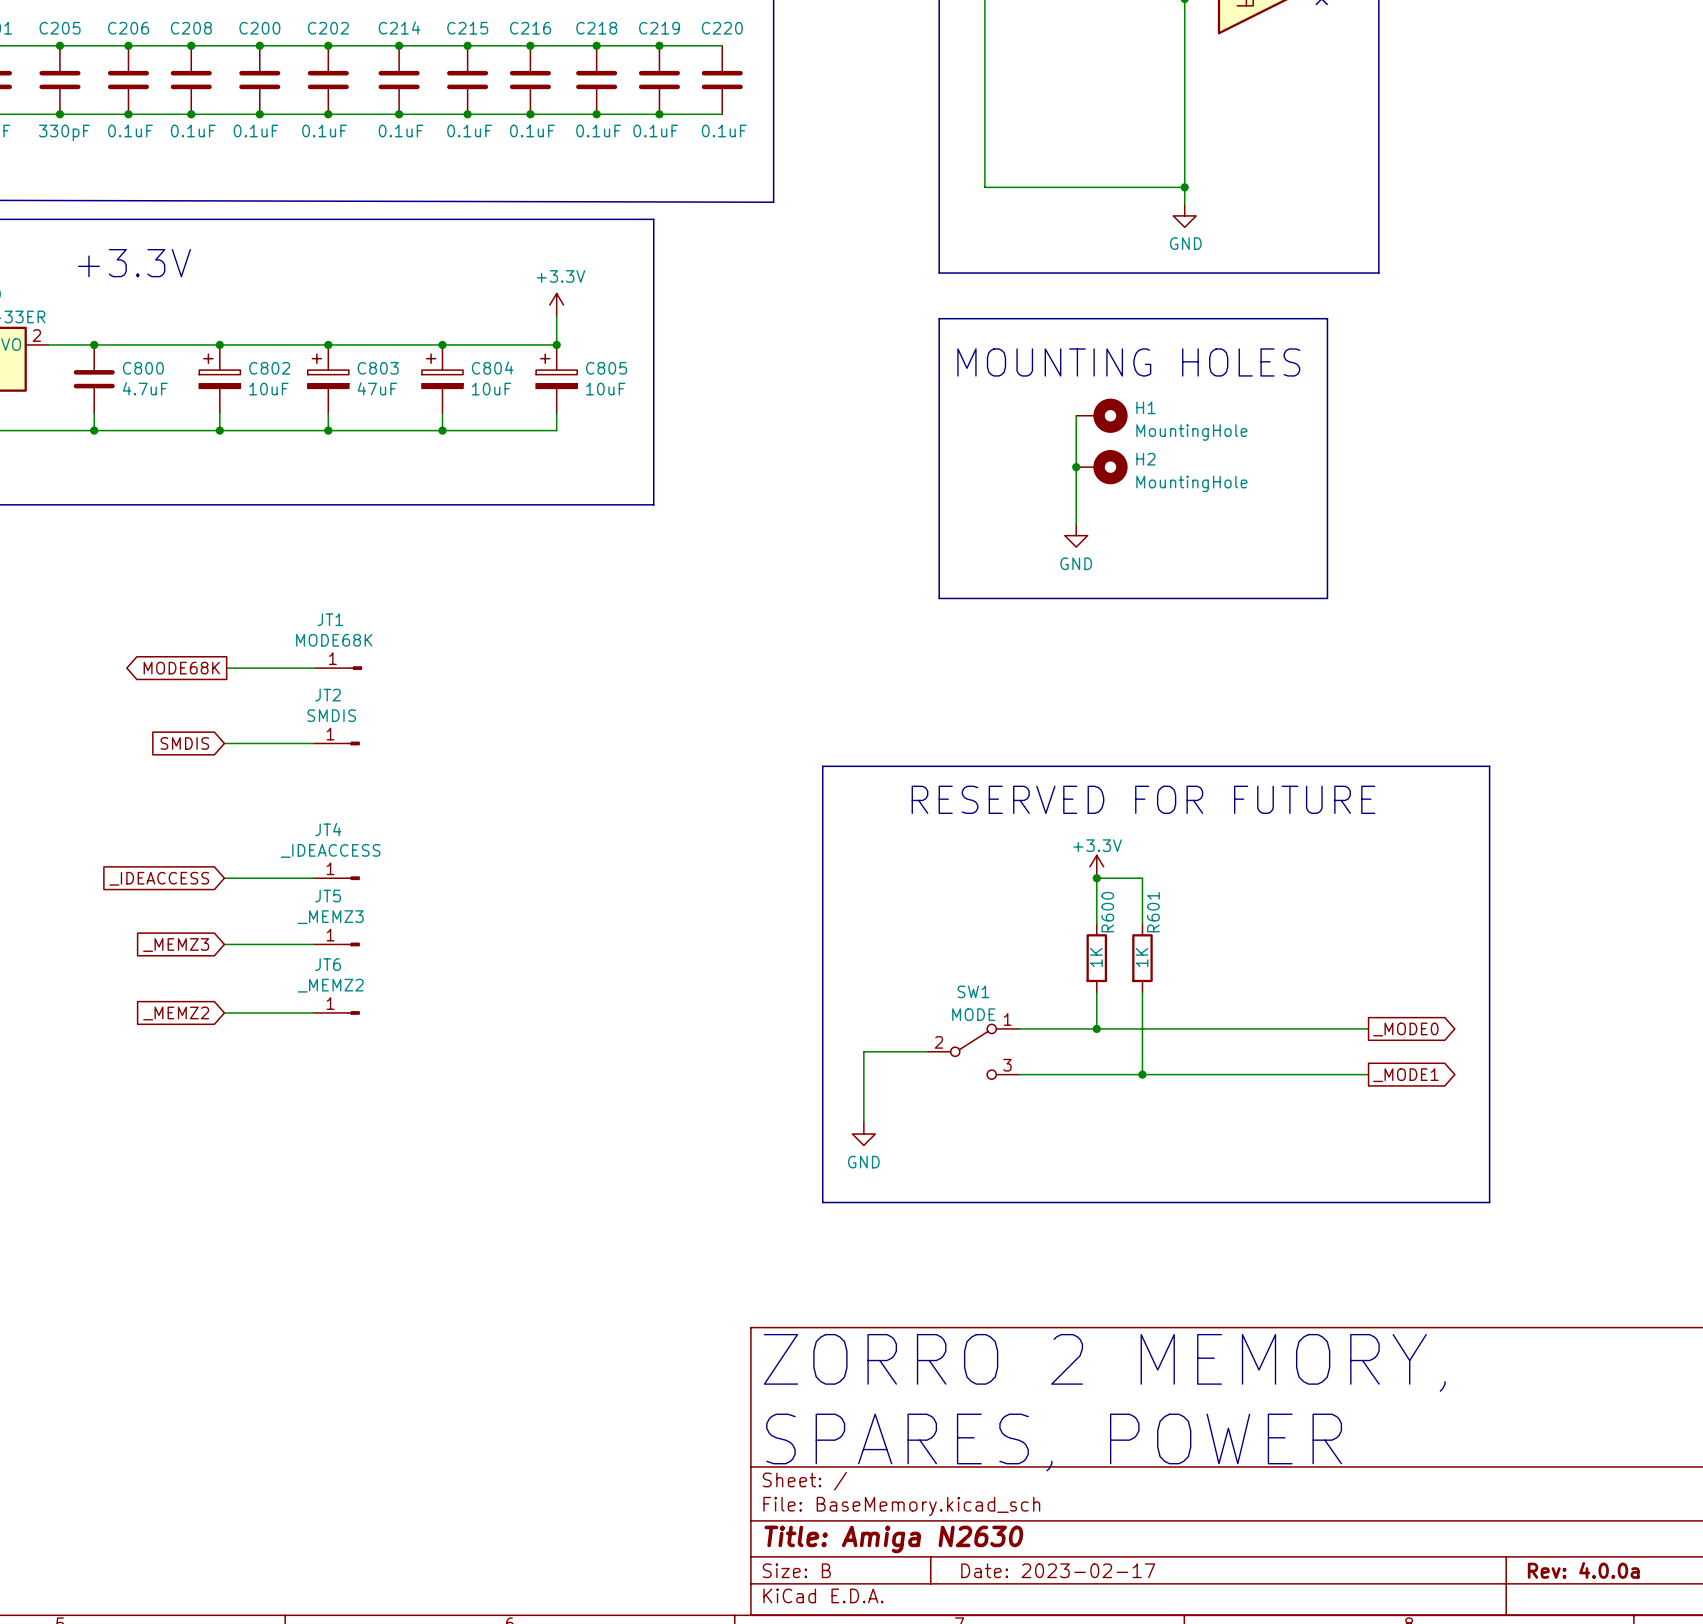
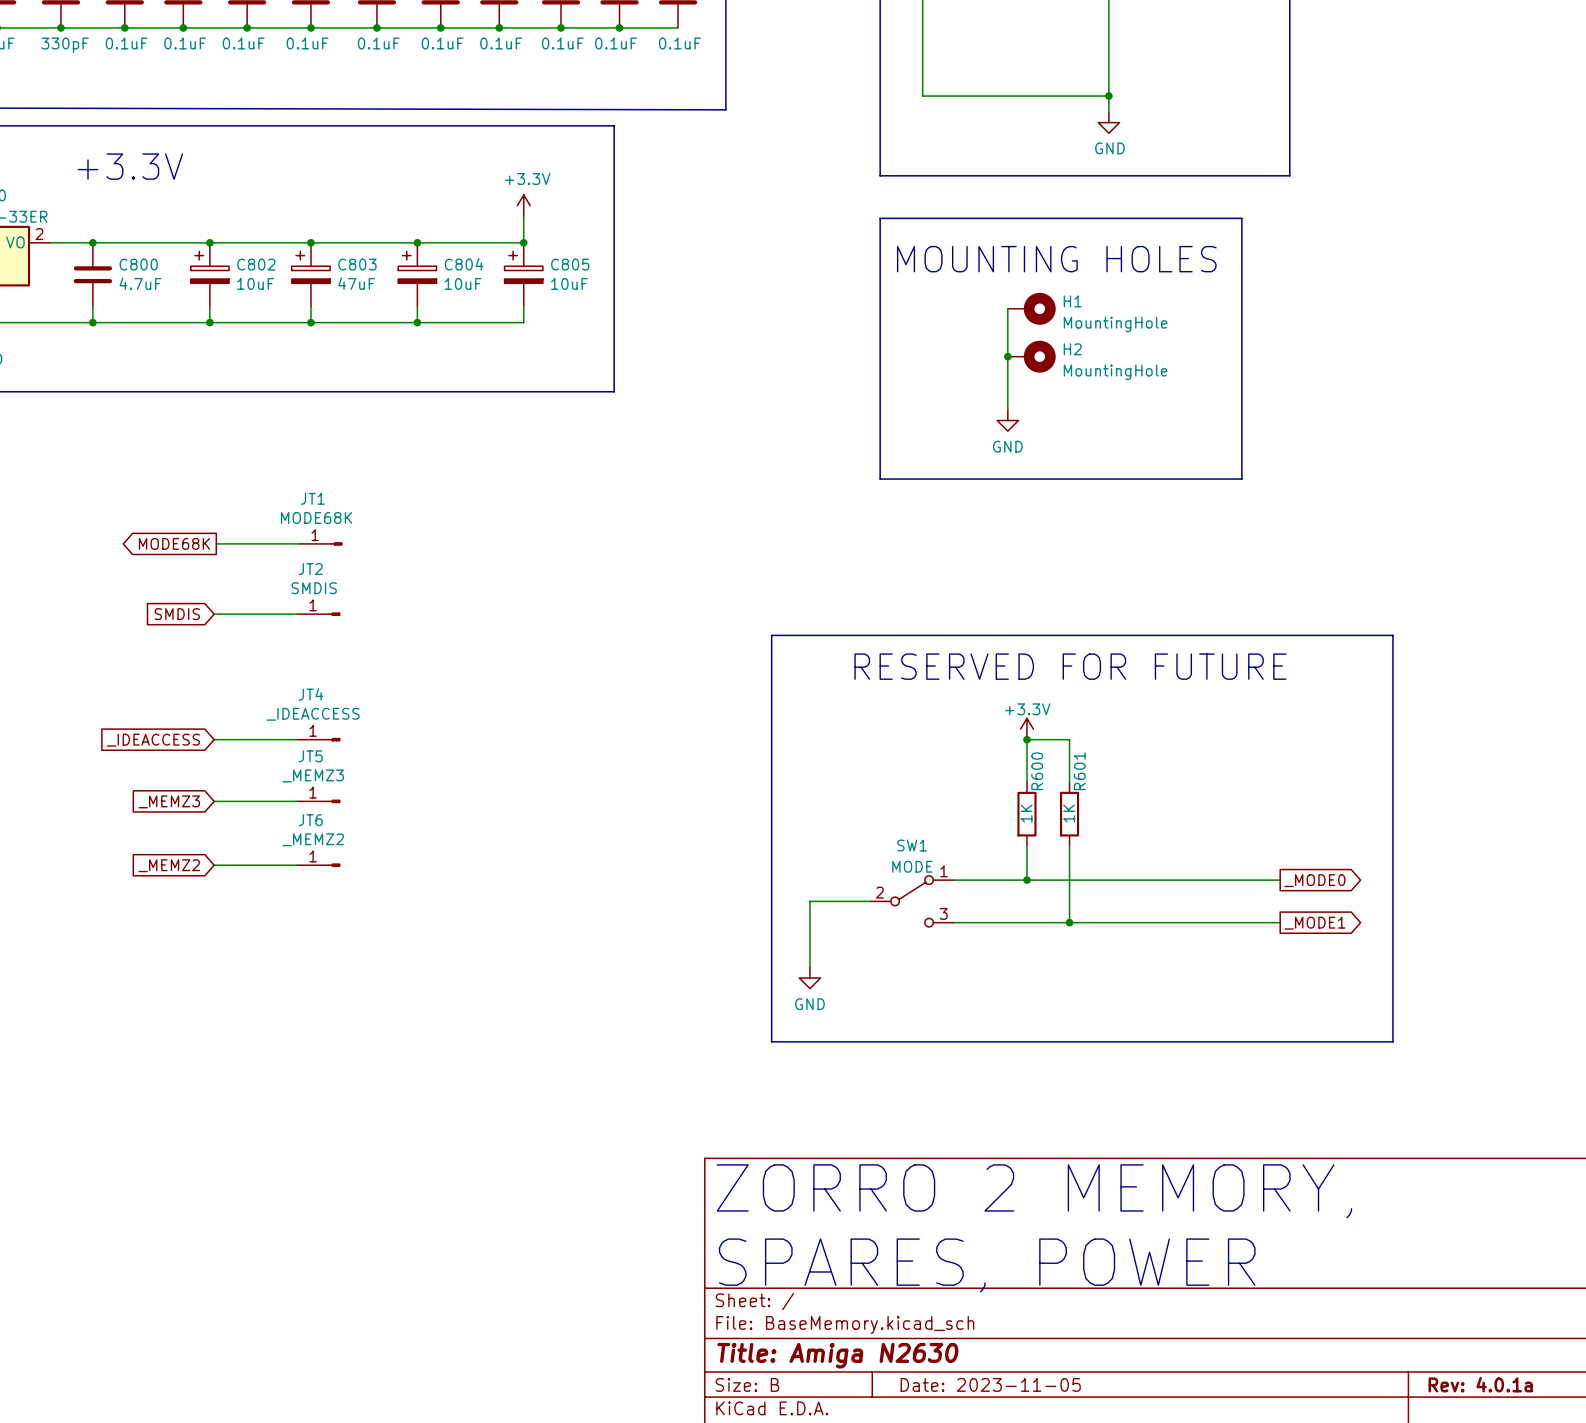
title block: Date: 2023-02-17 (1058, 1570) -> Date: 2023-11-05 (990, 1384)
title block: Rev: 4.0.0a (1583, 1570) -> Rev: 4.0.1a (1480, 1384)

